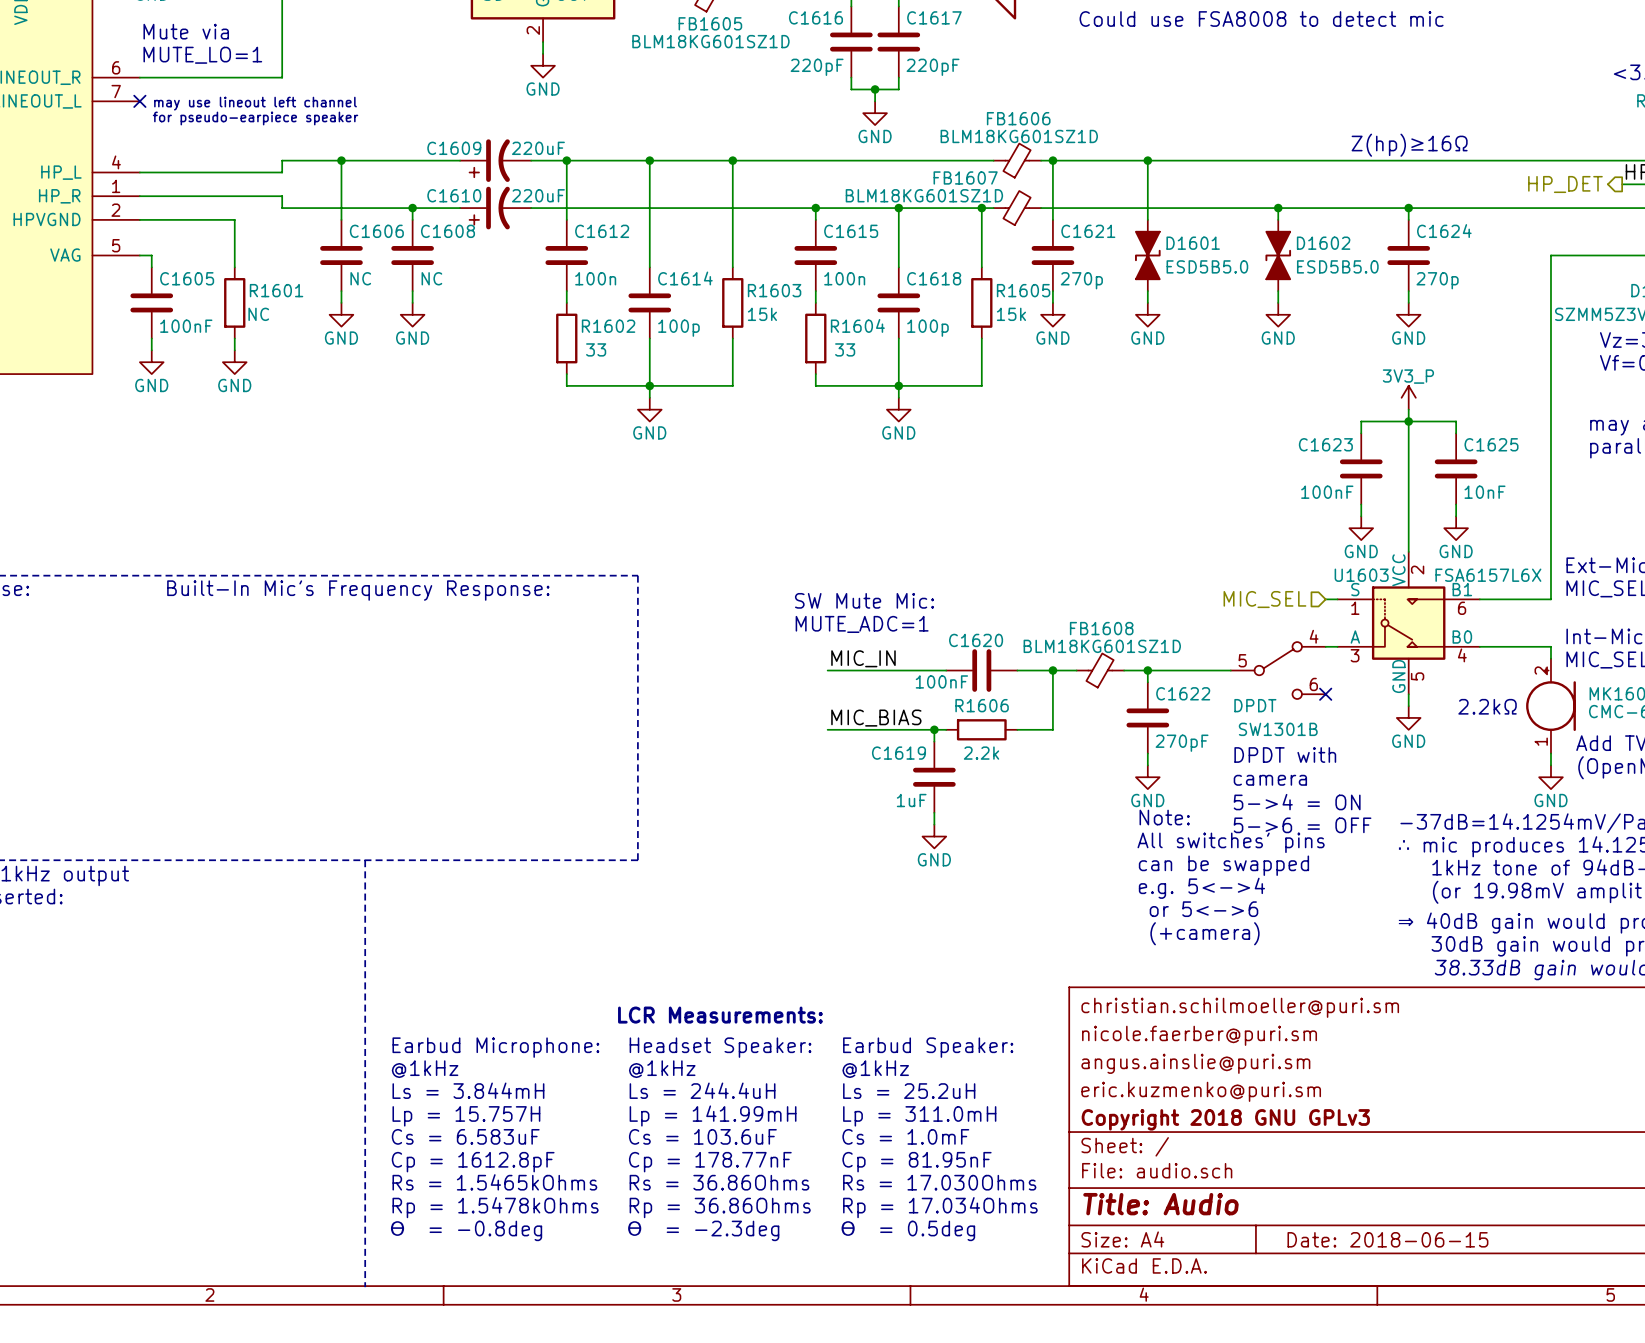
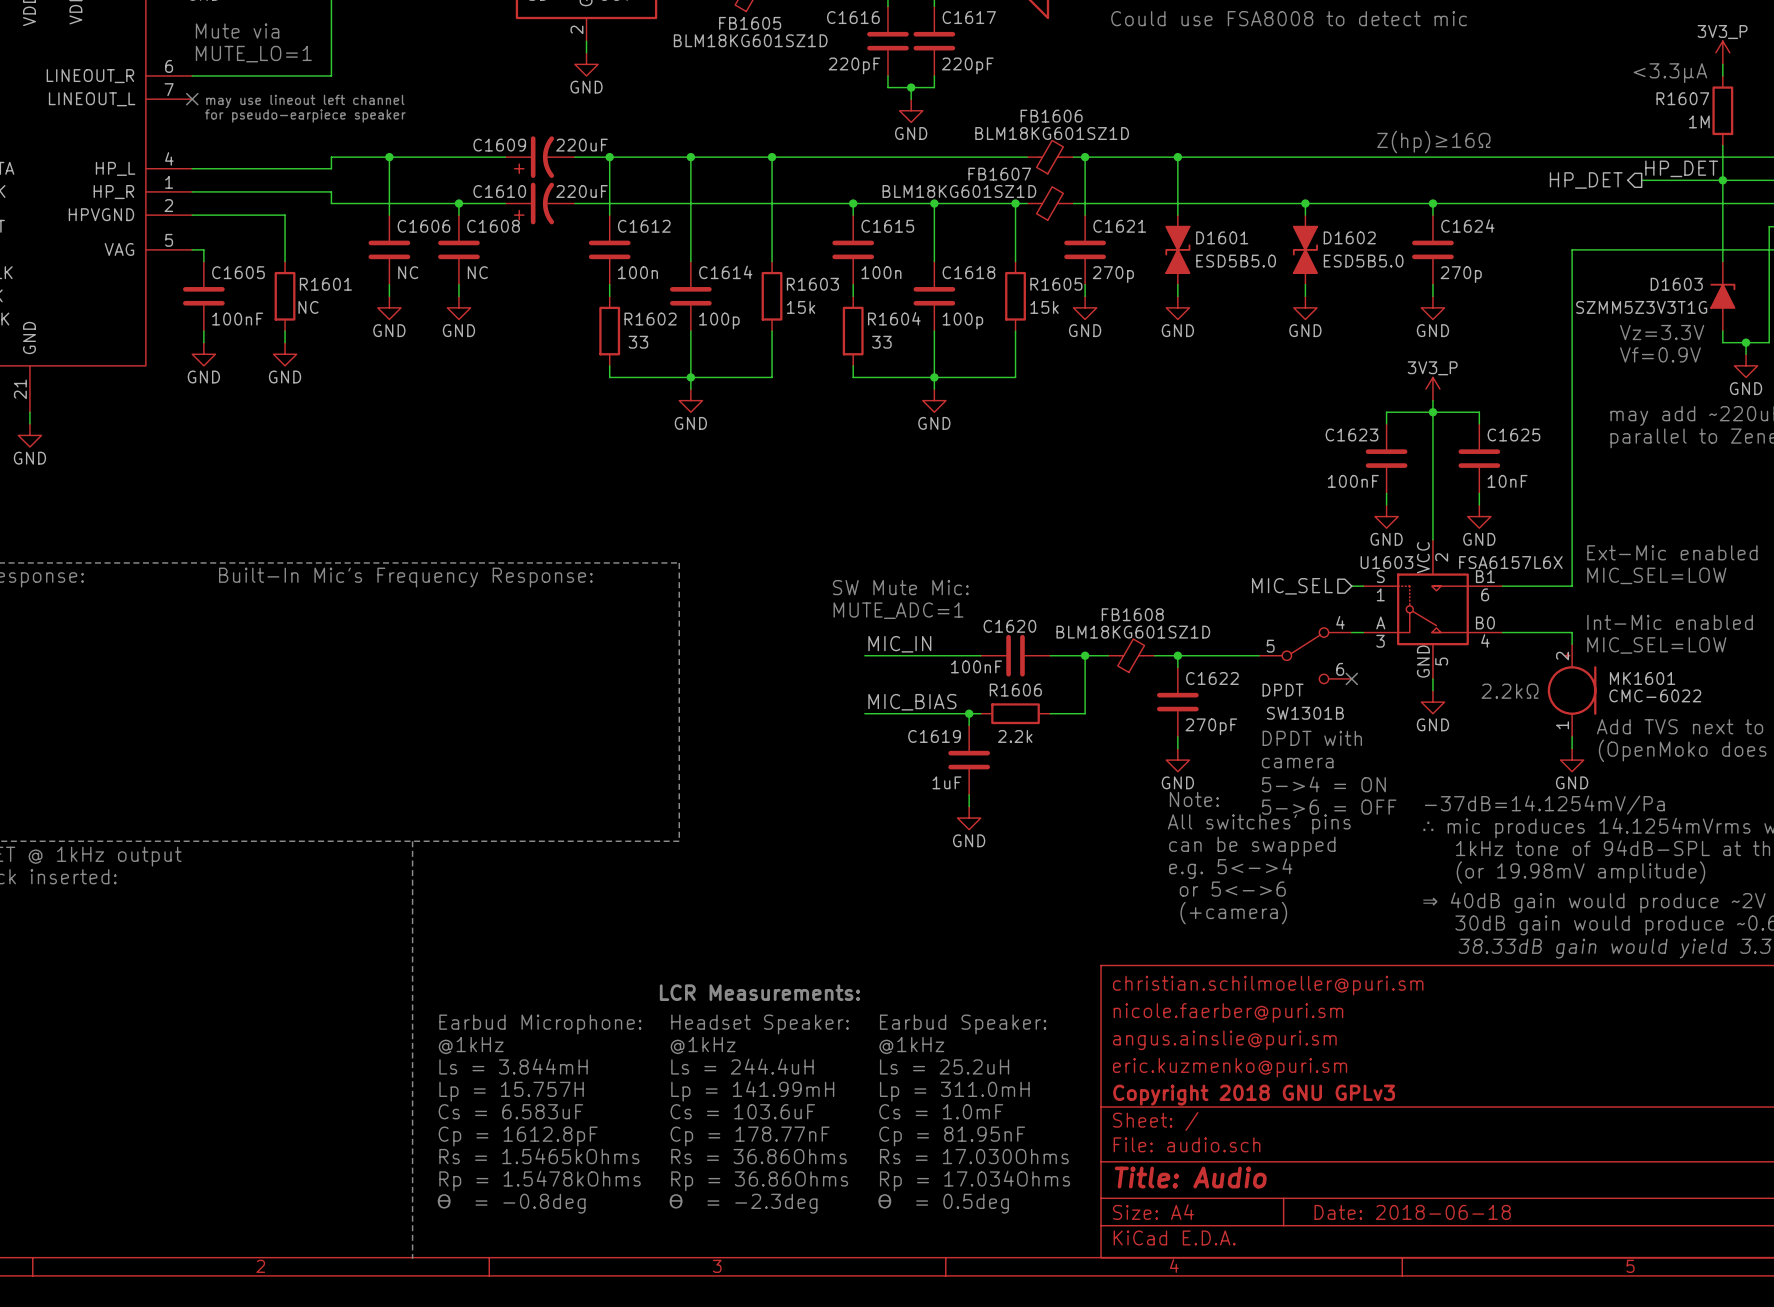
title block: Date: 2018-06-15 (1387, 1239) -> Date: 2018-06-18 (1412, 1212)

